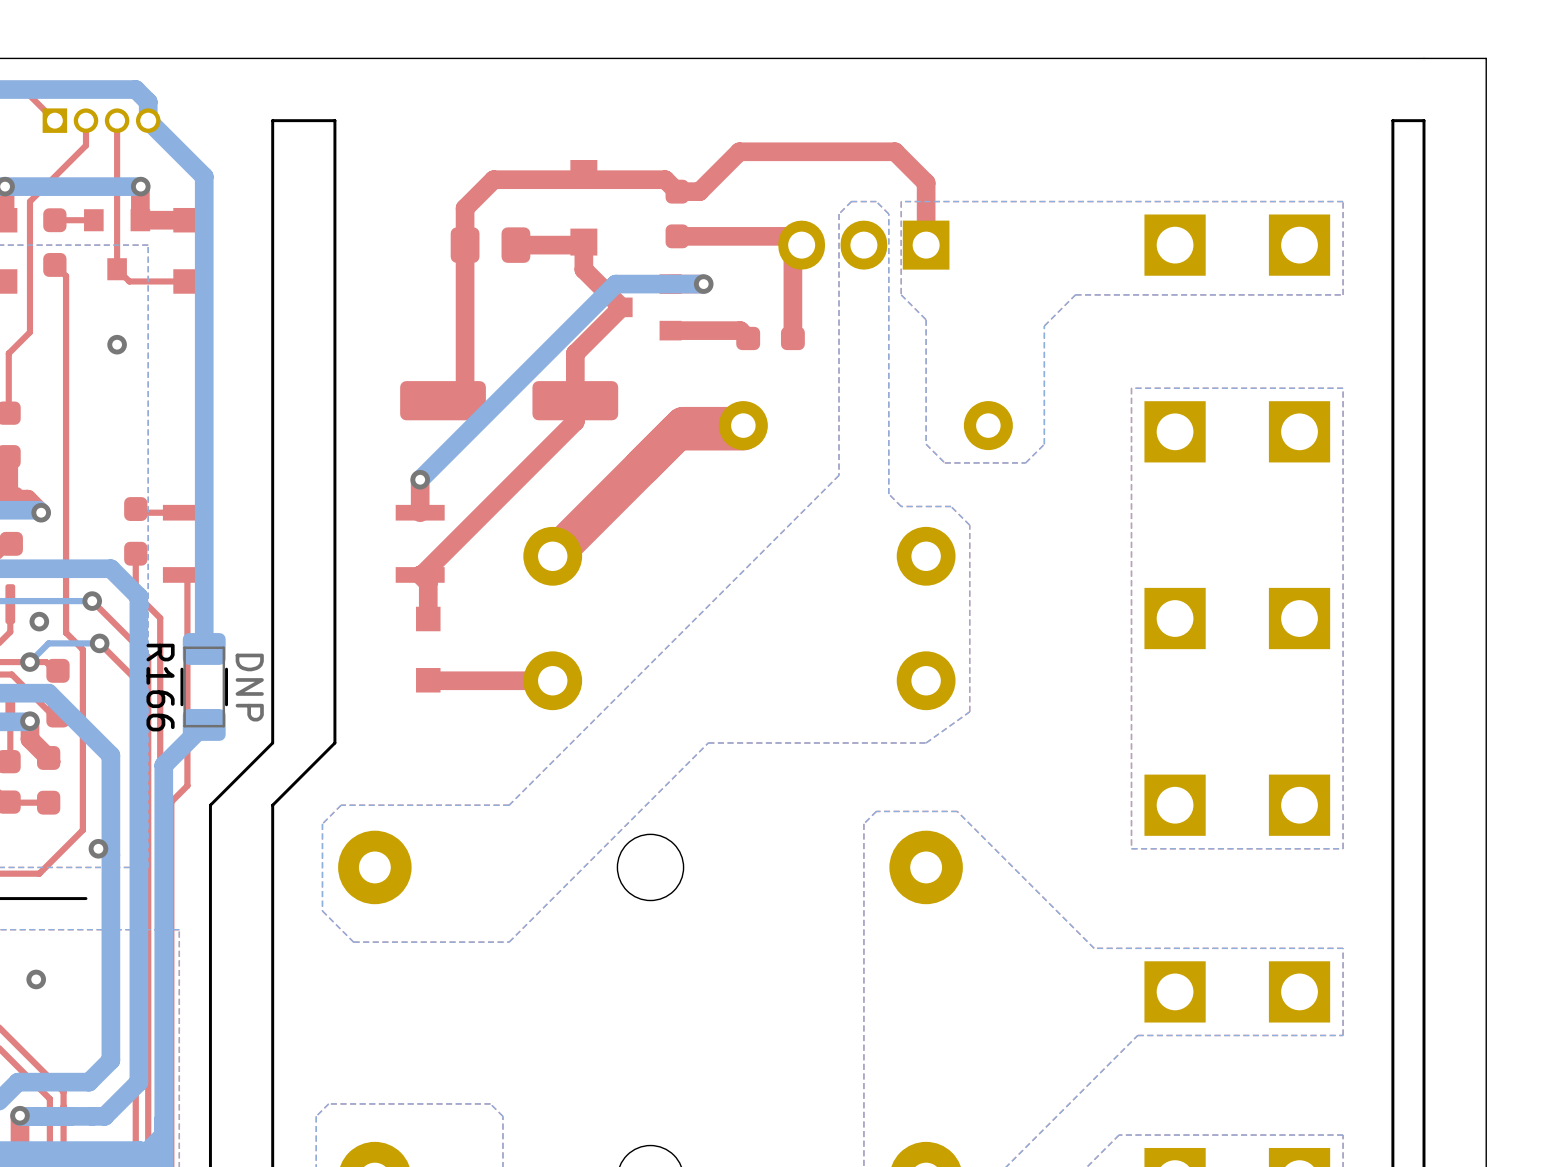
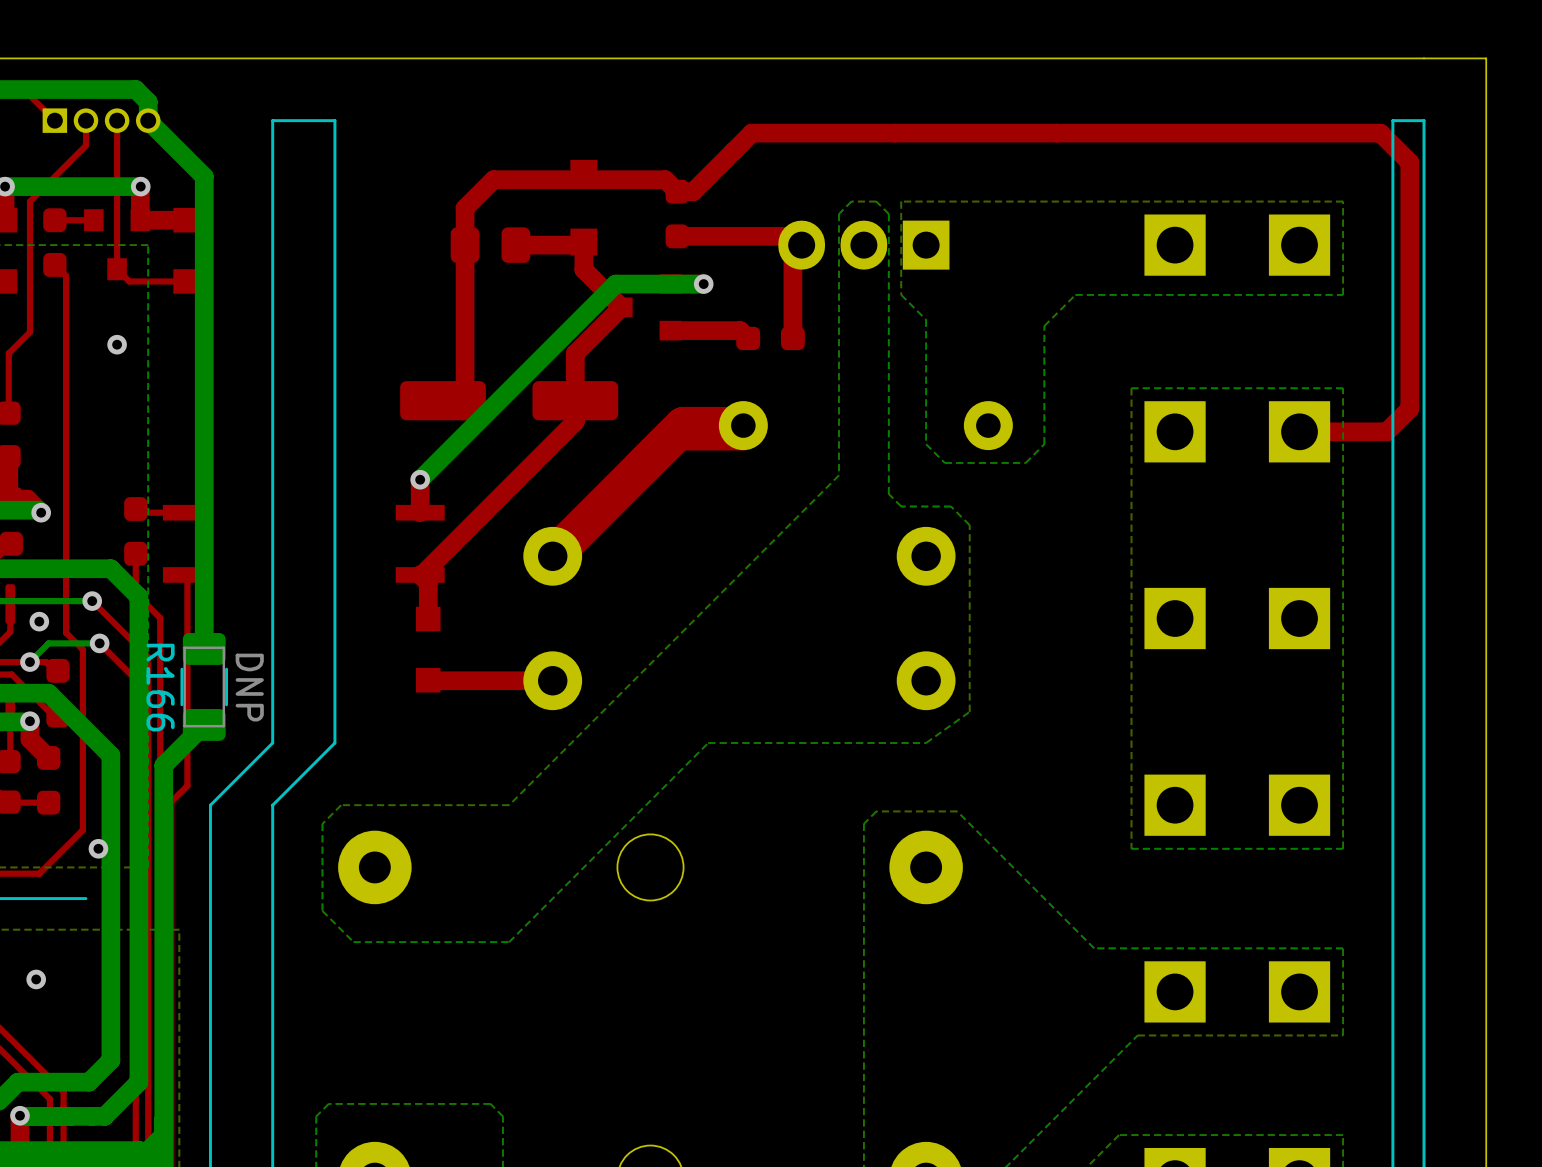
top track: (693, 191) (699, 191) (739, 151) (895, 151) (926, 182) (926, 245) -> (693, 191) (751, 133) (1380, 133) (1409, 162) (1409, 408) (1386, 431) (1299, 431)

